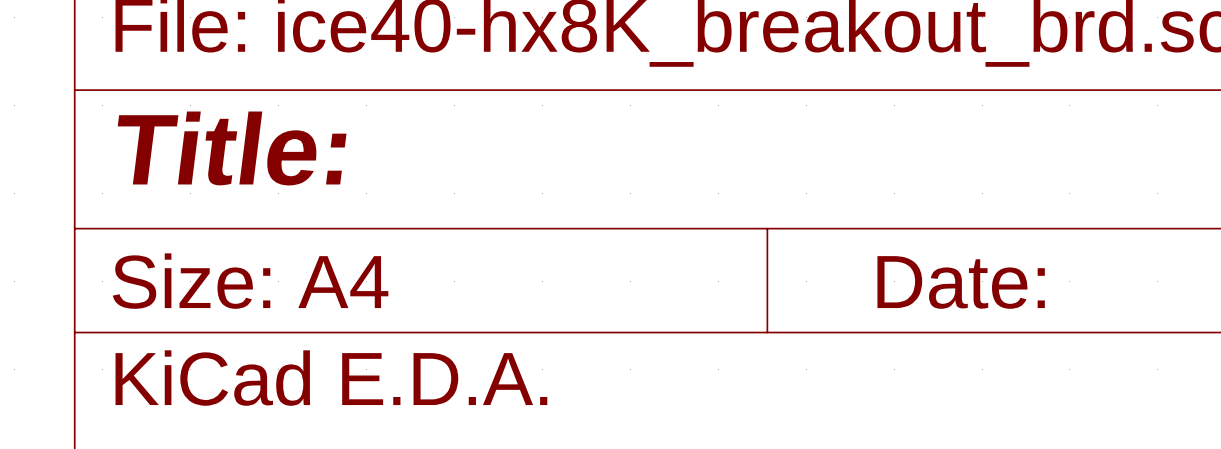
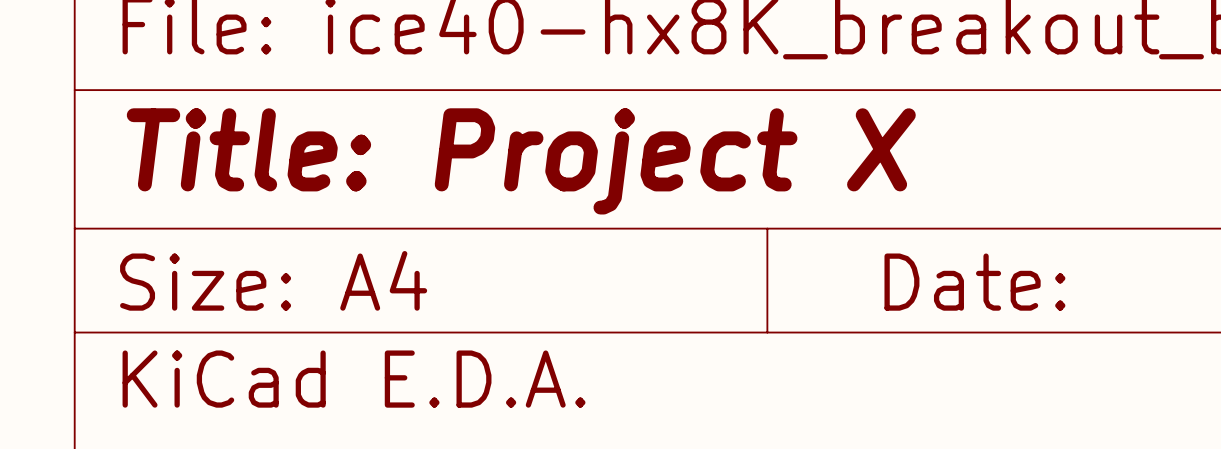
title block: Title: (232, 148) -> Title: Project X (521, 161)

